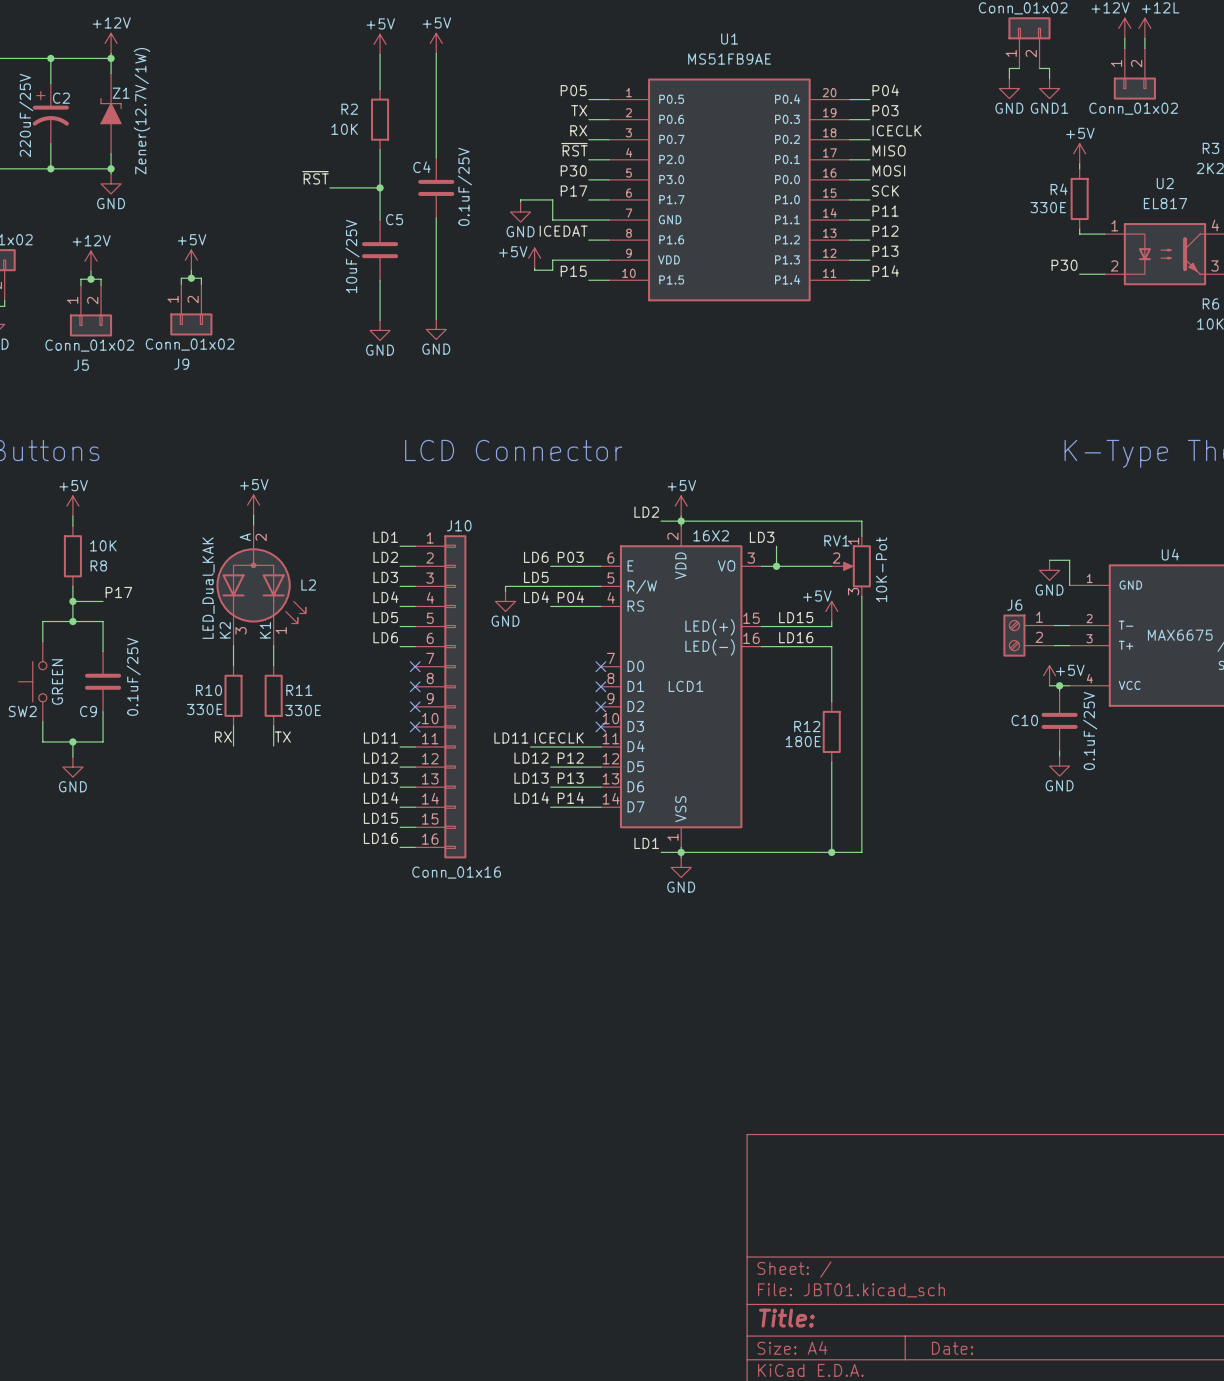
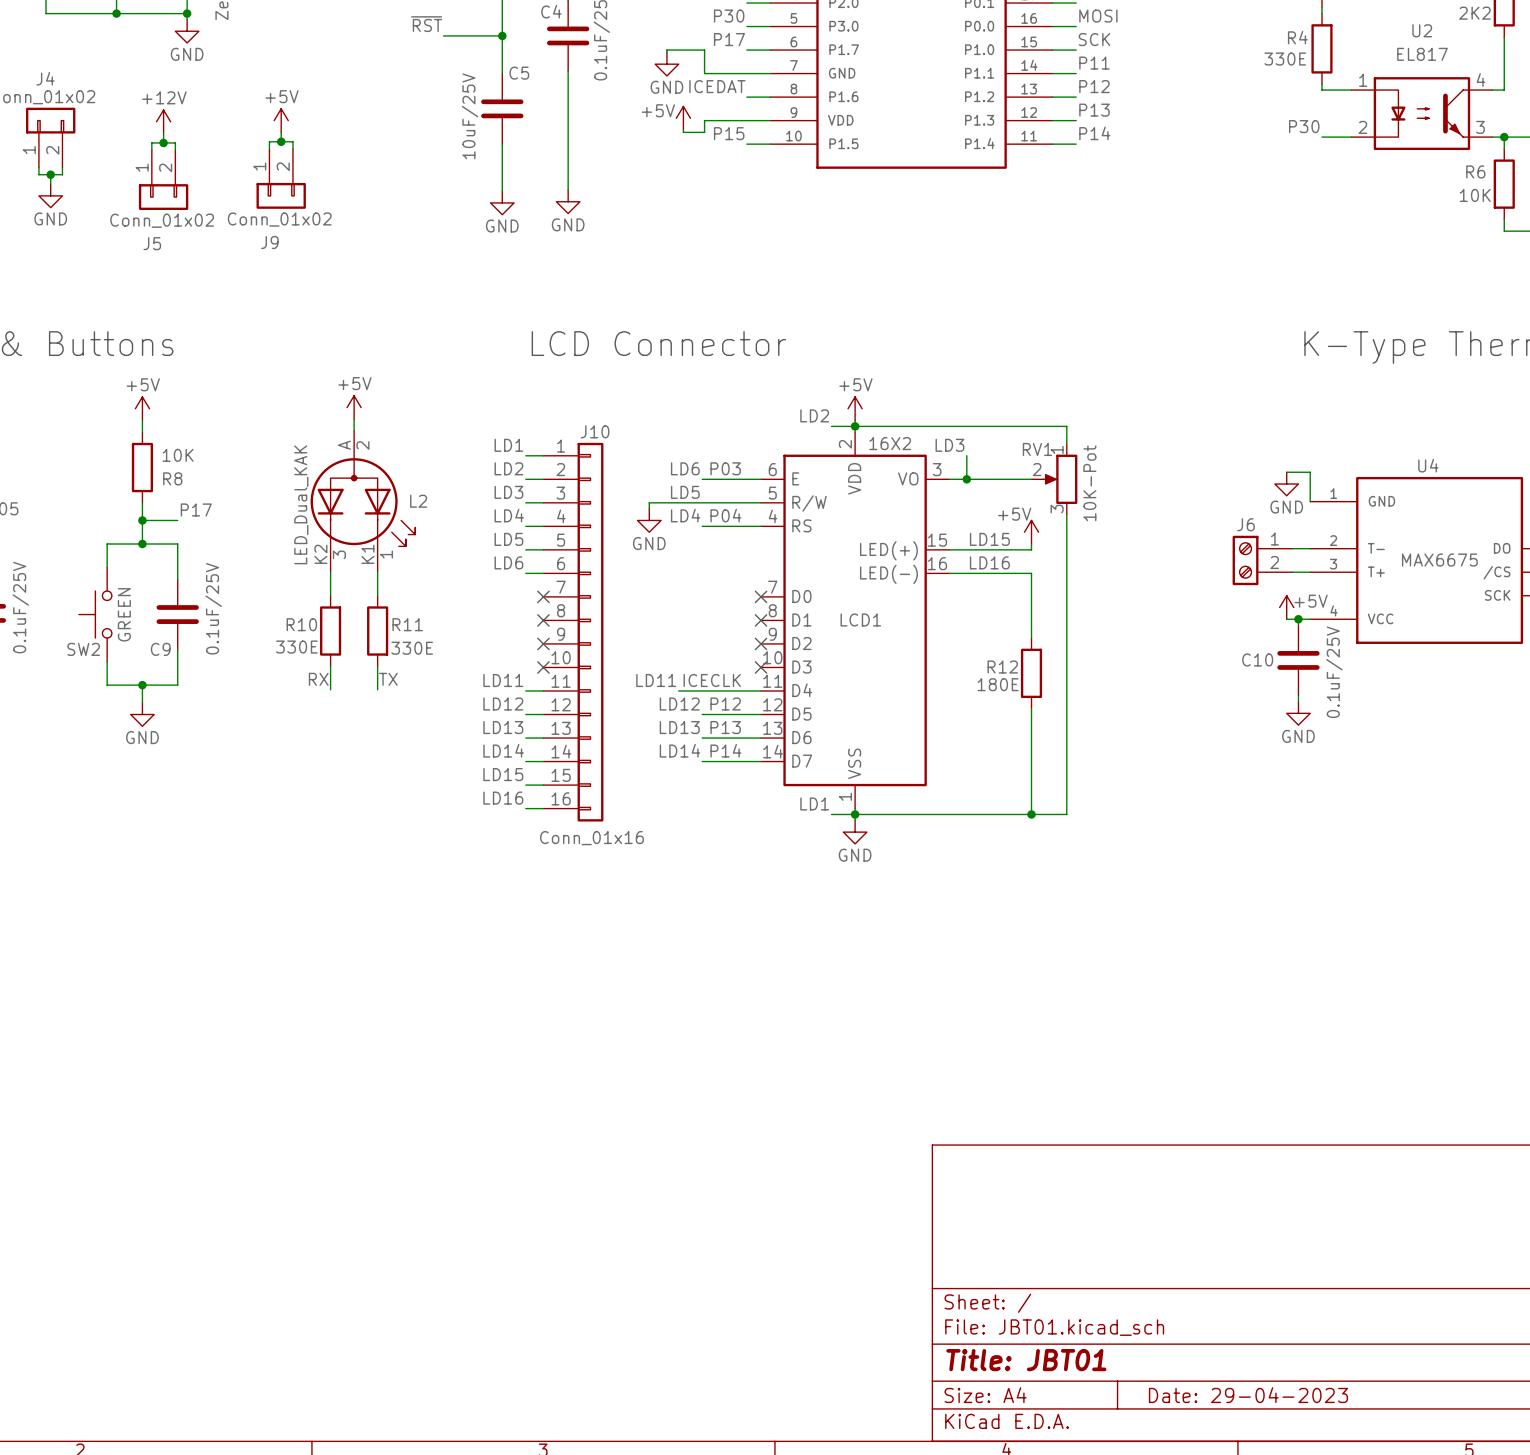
title block: Title: (786, 1318) -> Title: JBT01 (1026, 1360)
title block: Date: (952, 1348) -> Date: 29-04-2023 (1248, 1395)

